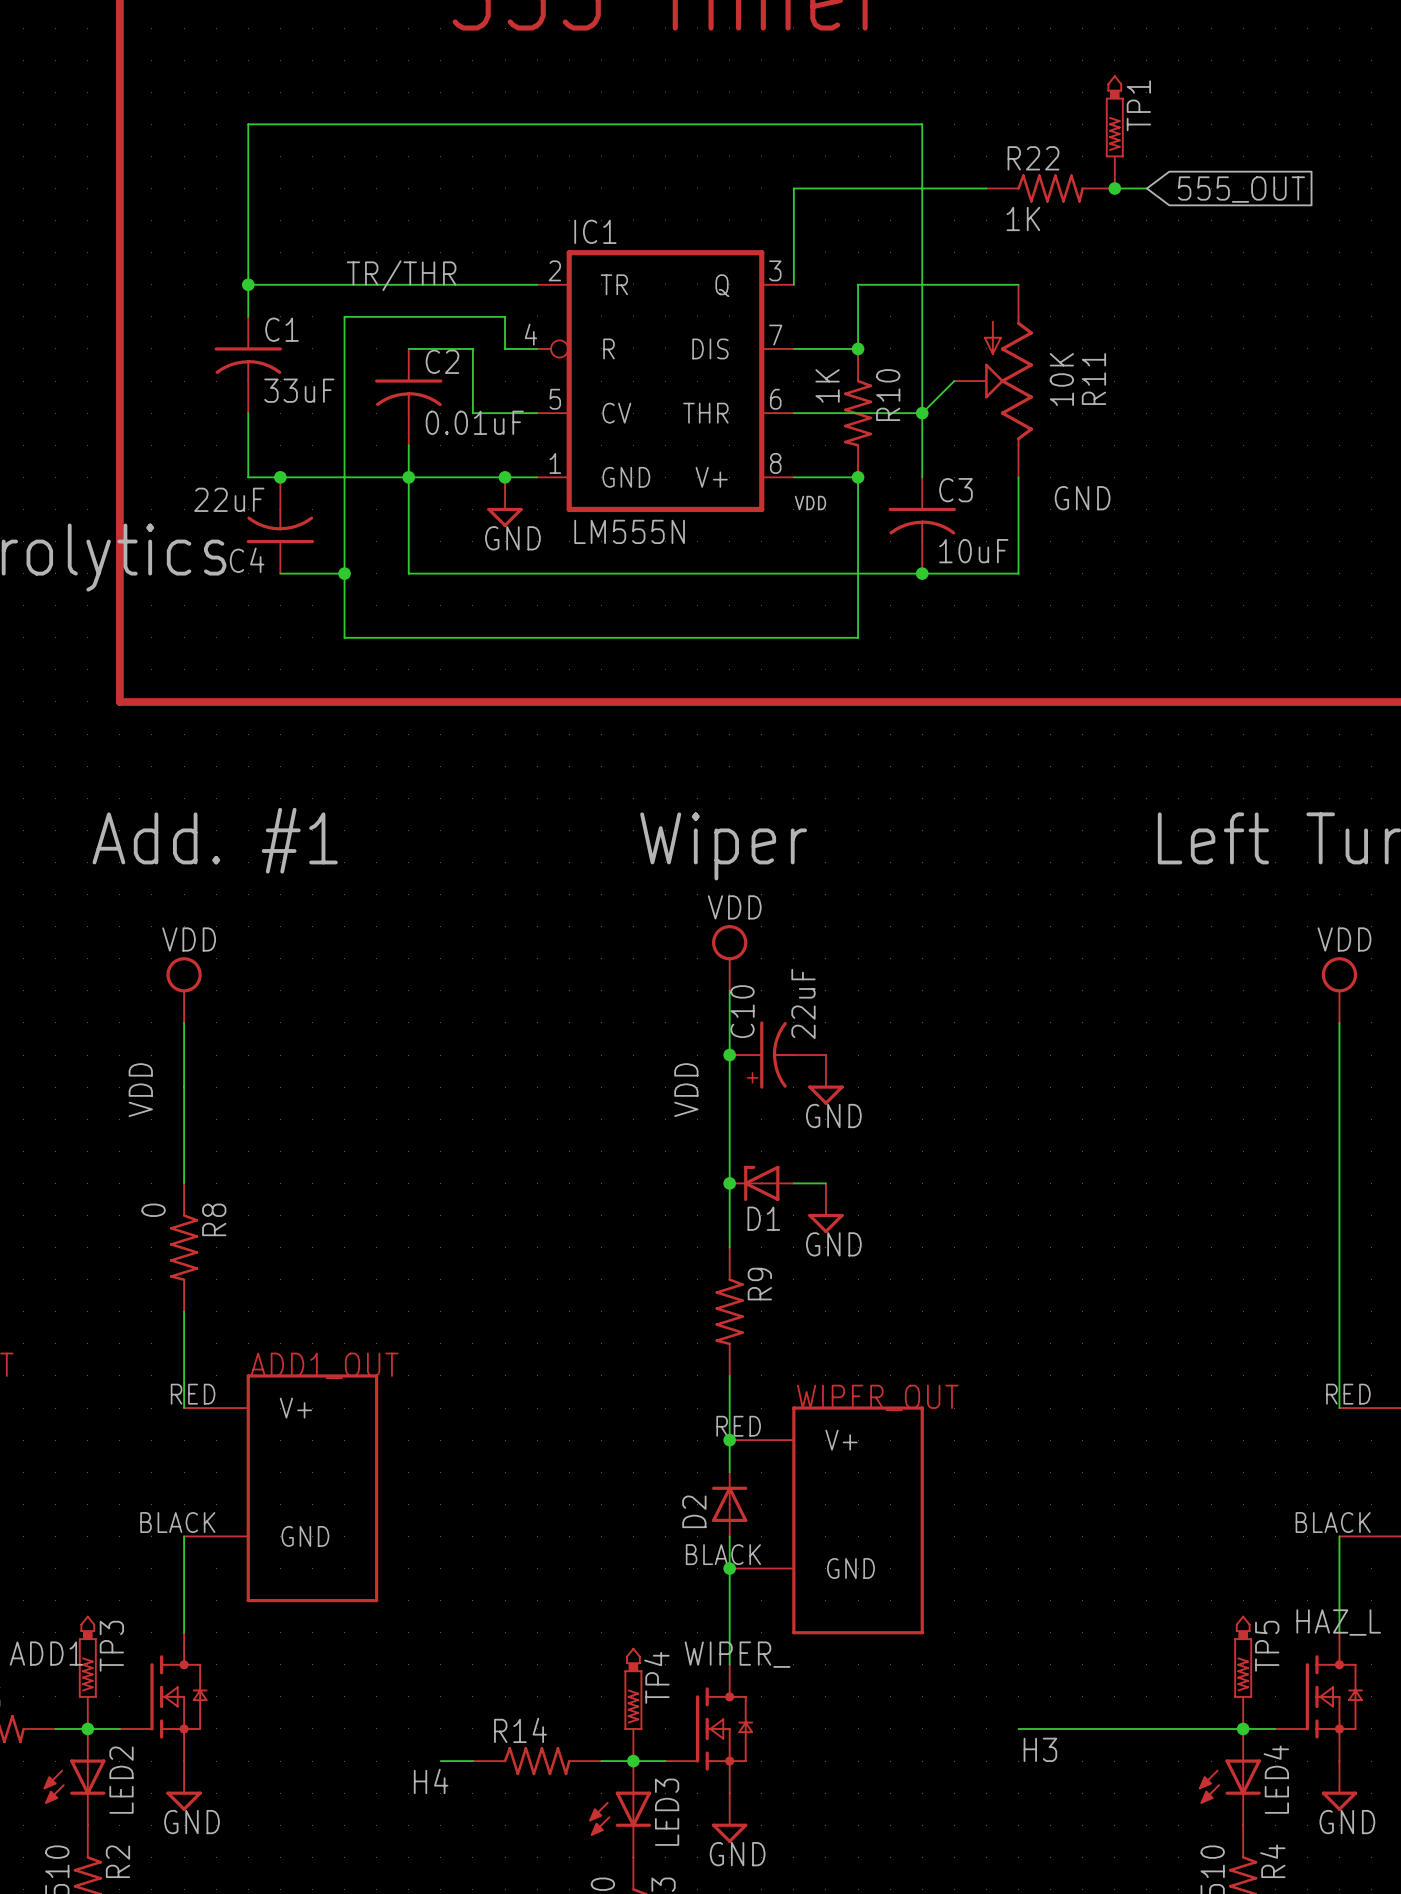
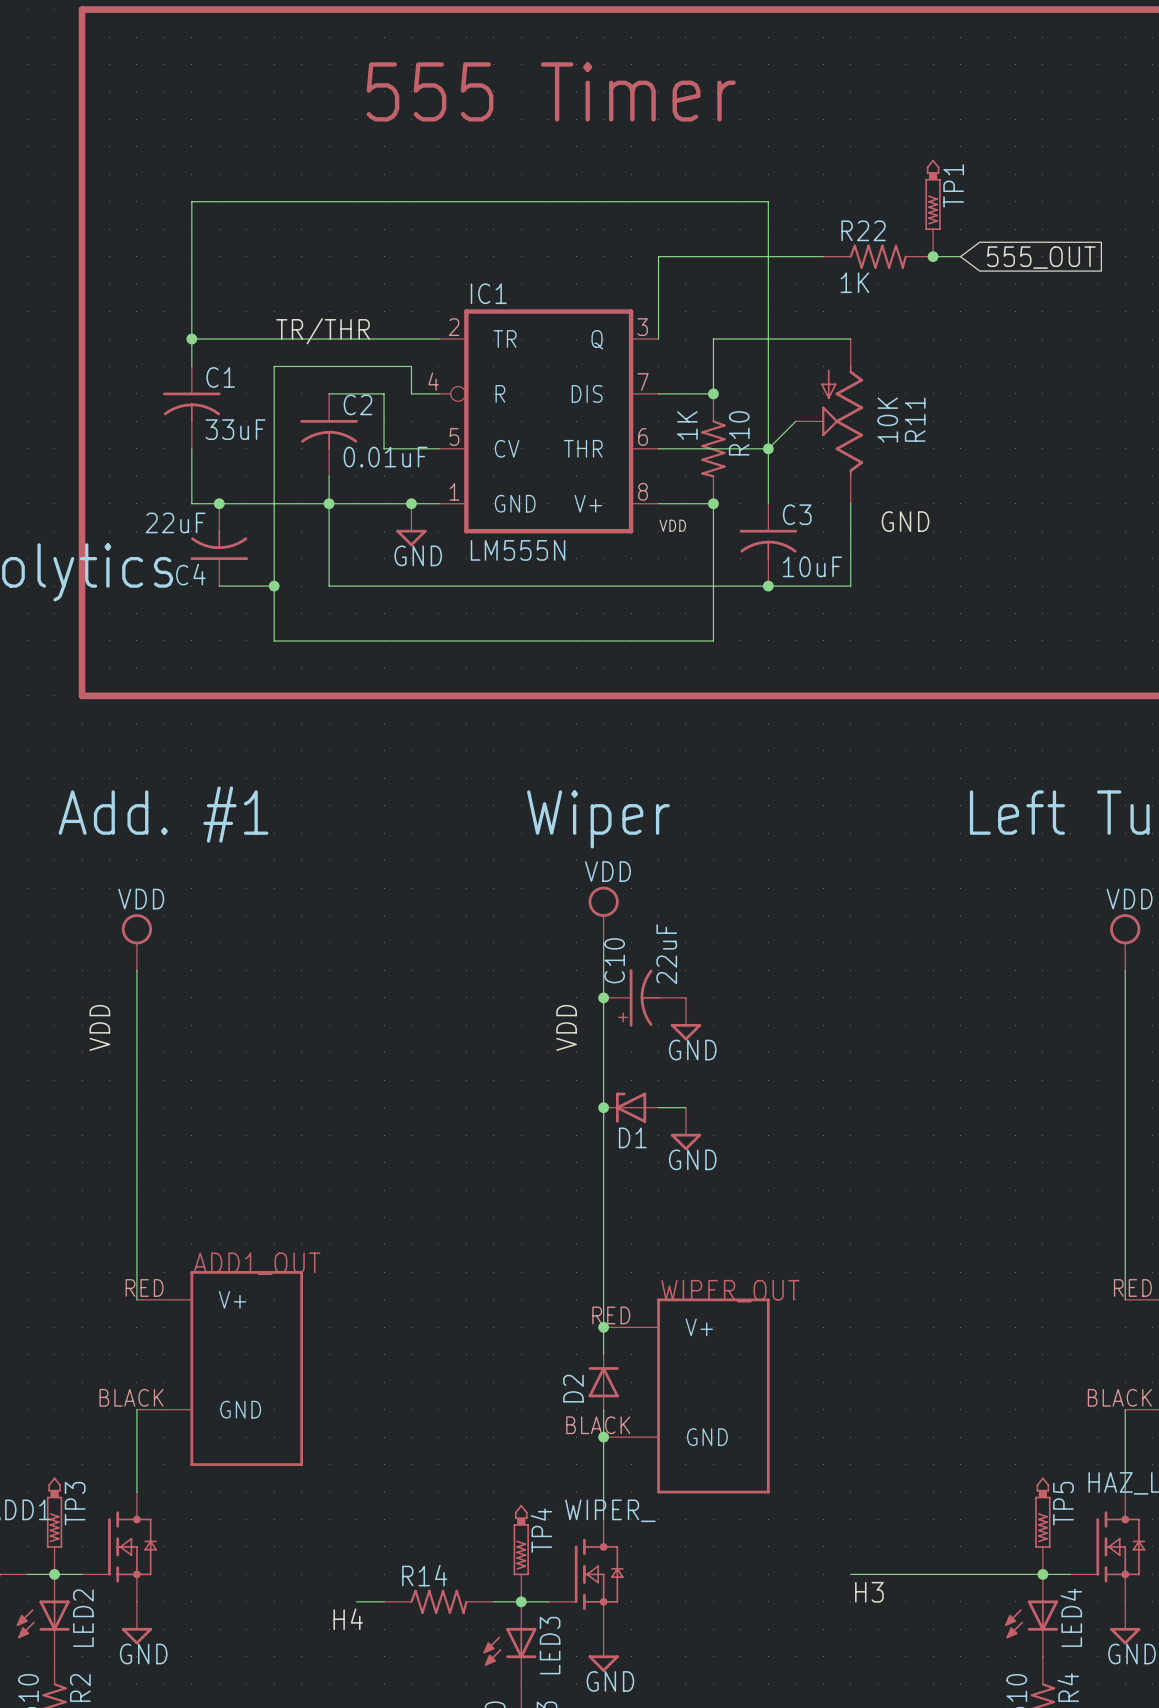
R8: 0 (184, 1247) -> none
R9: (729, 1311) -> none

